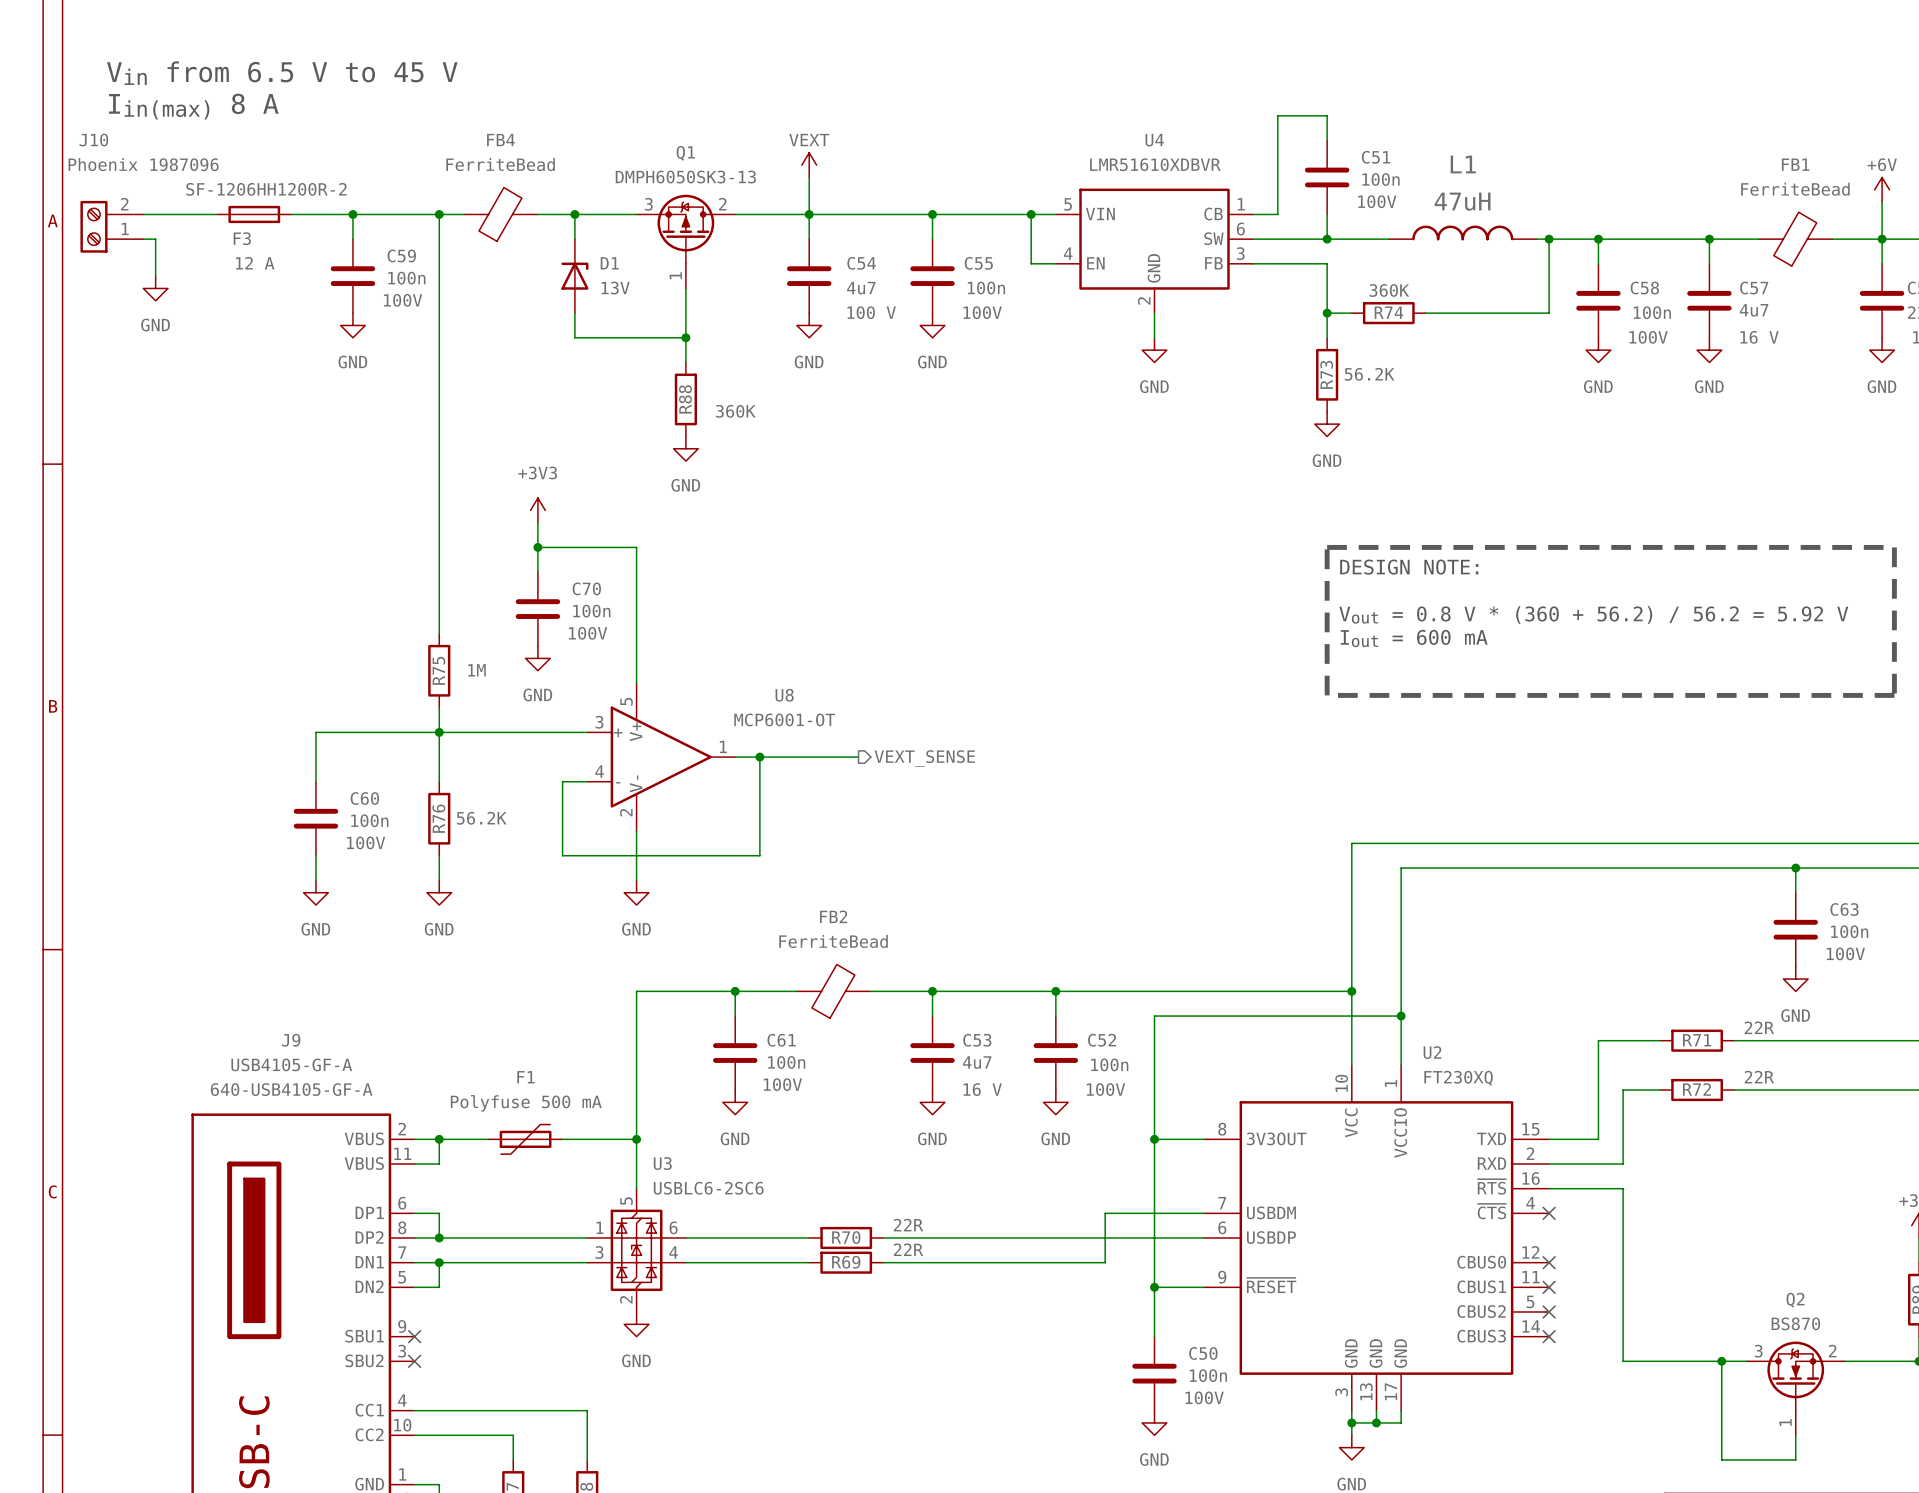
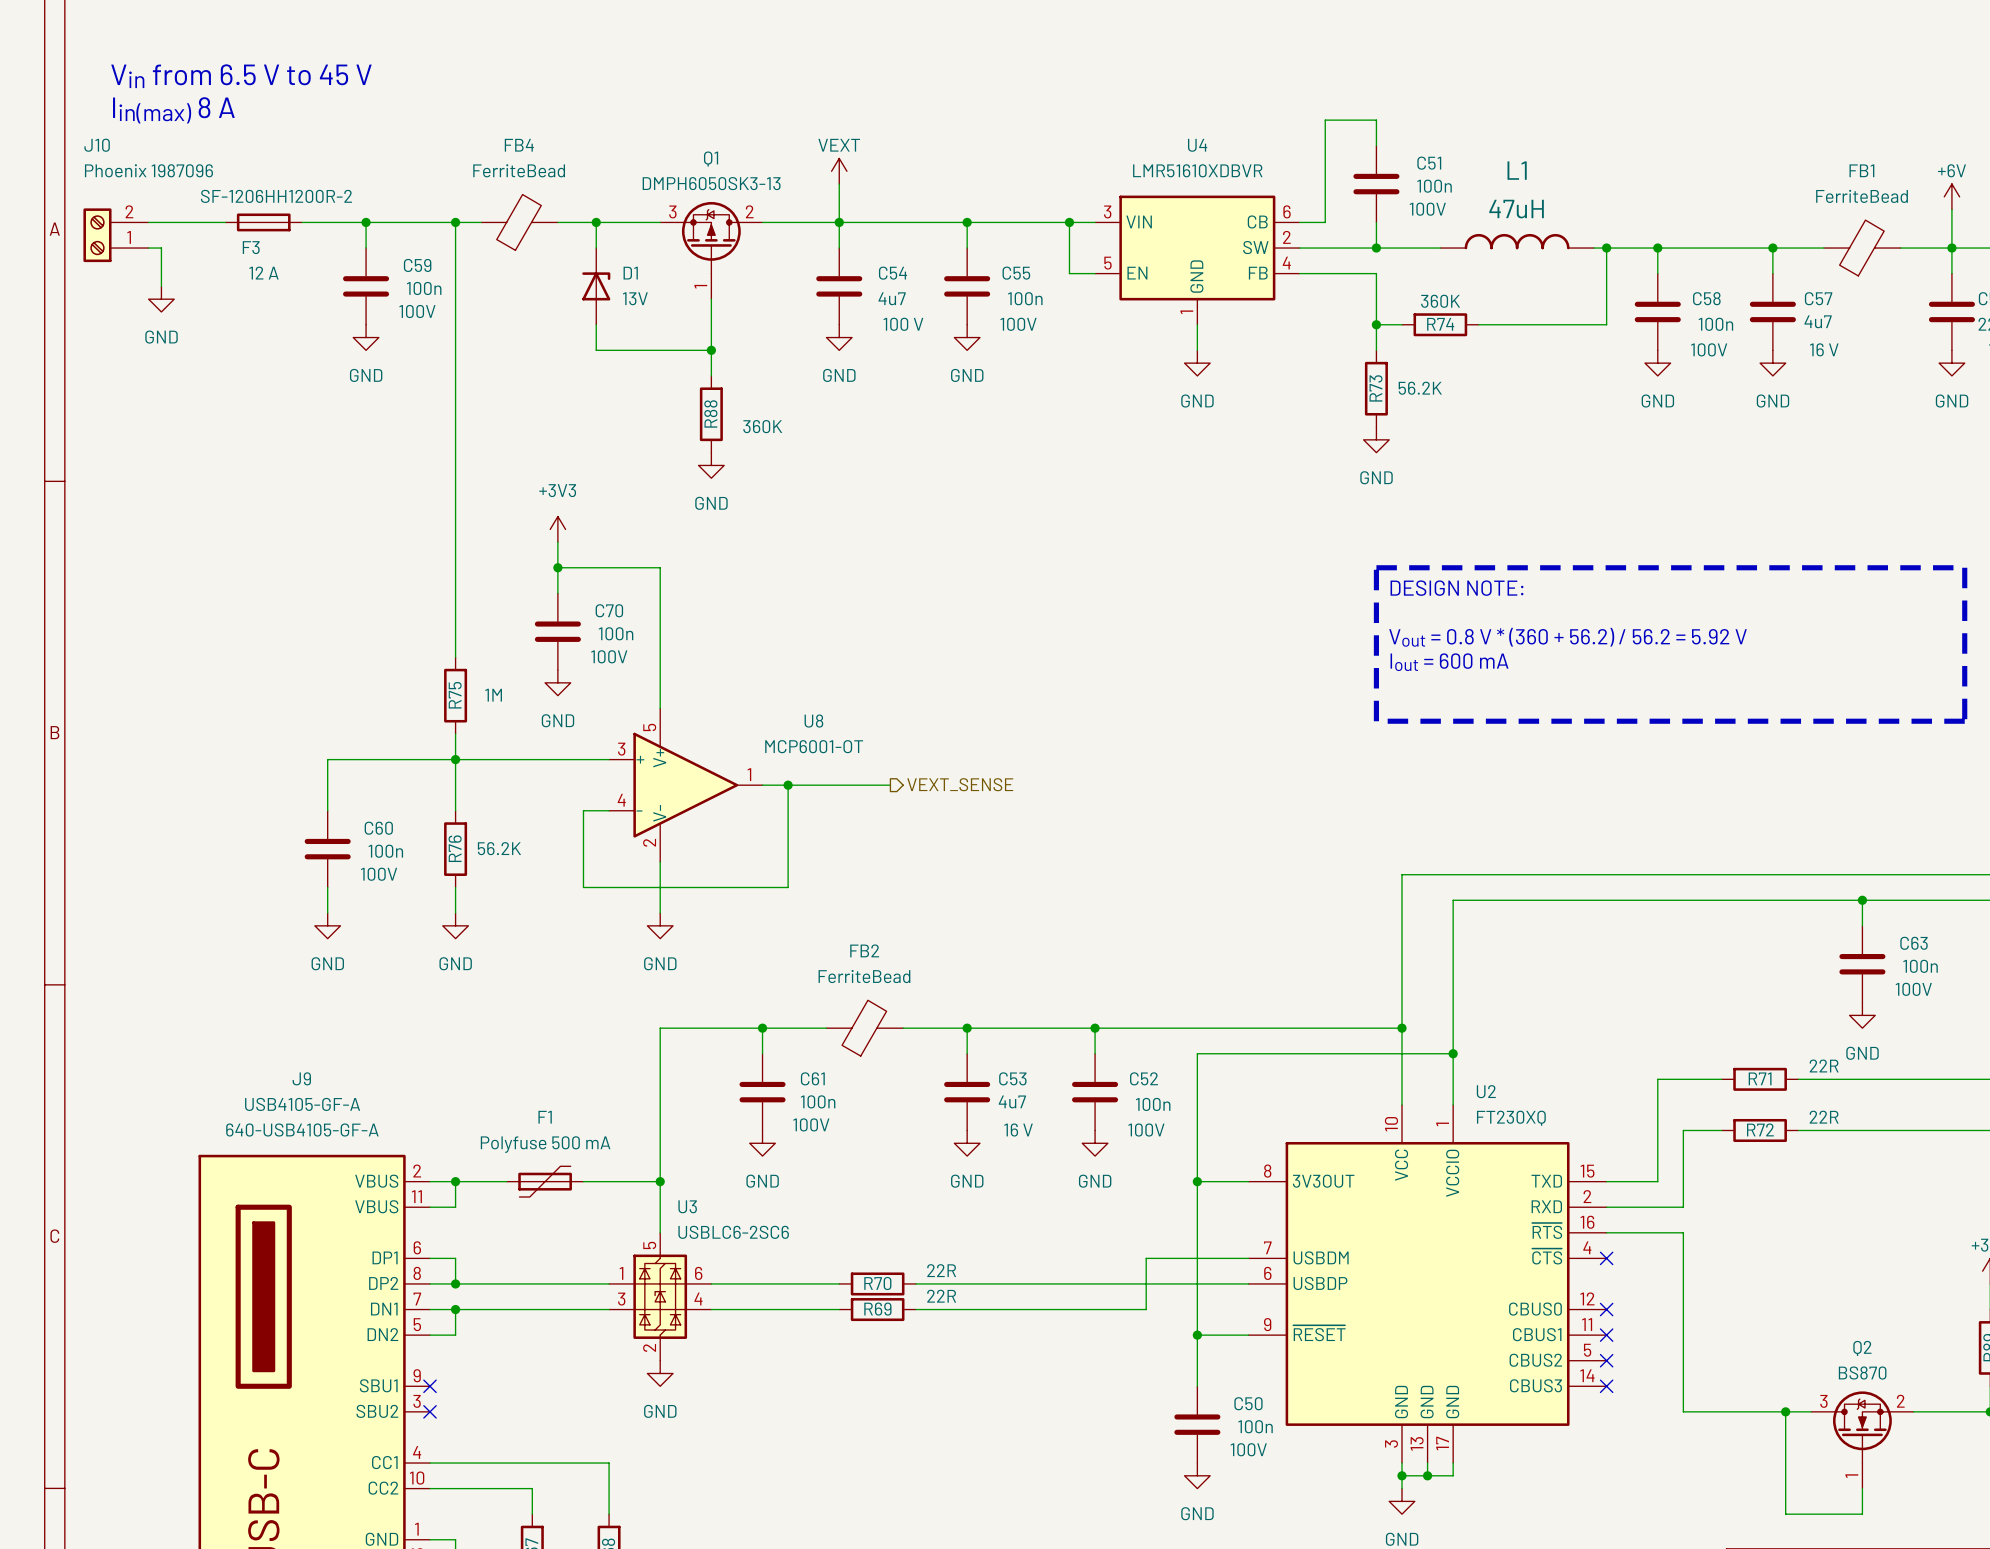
U4 pin number: 5 (1068, 204) -> 3 (1107, 211)
U4 pin number: 1 (1241, 204) -> 6 (1287, 211)
U4 pin number: 6 (1240, 228) -> 2 (1286, 237)
U4 pin number: 4 (1068, 253) -> 5 (1107, 263)
U4 pin number: 3 (1240, 253) -> 4 (1286, 263)
U4 pin number: 2 (1144, 300) -> 1 (1186, 312)

